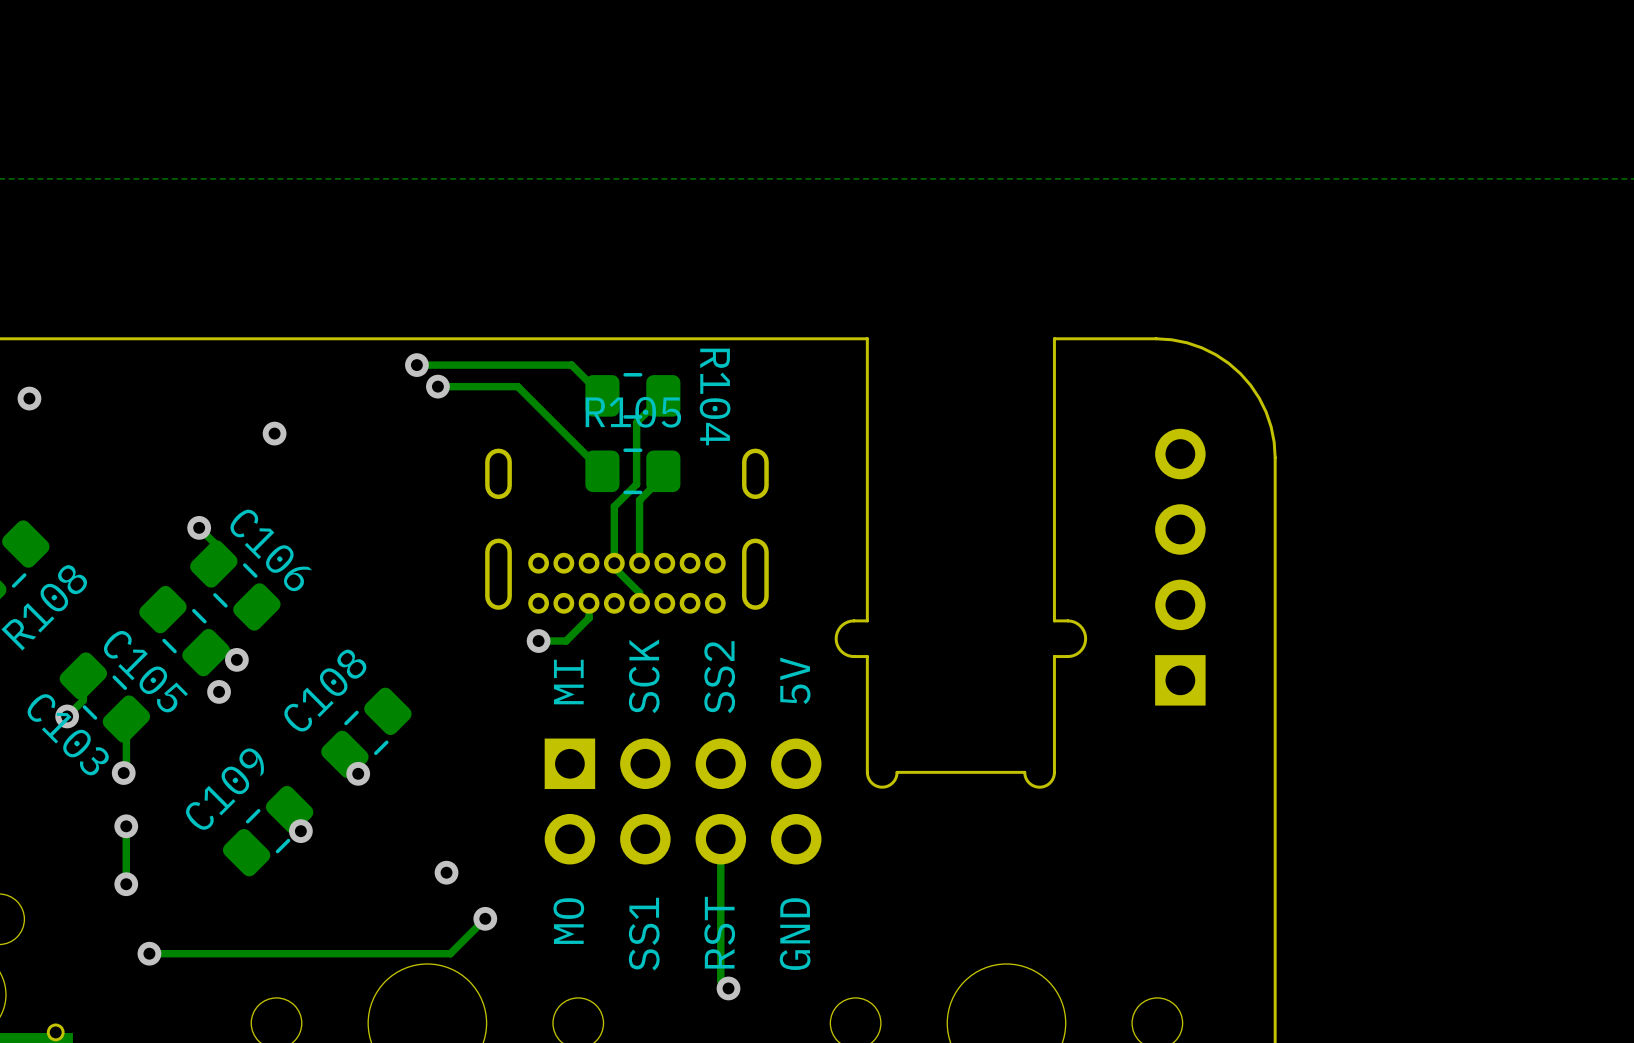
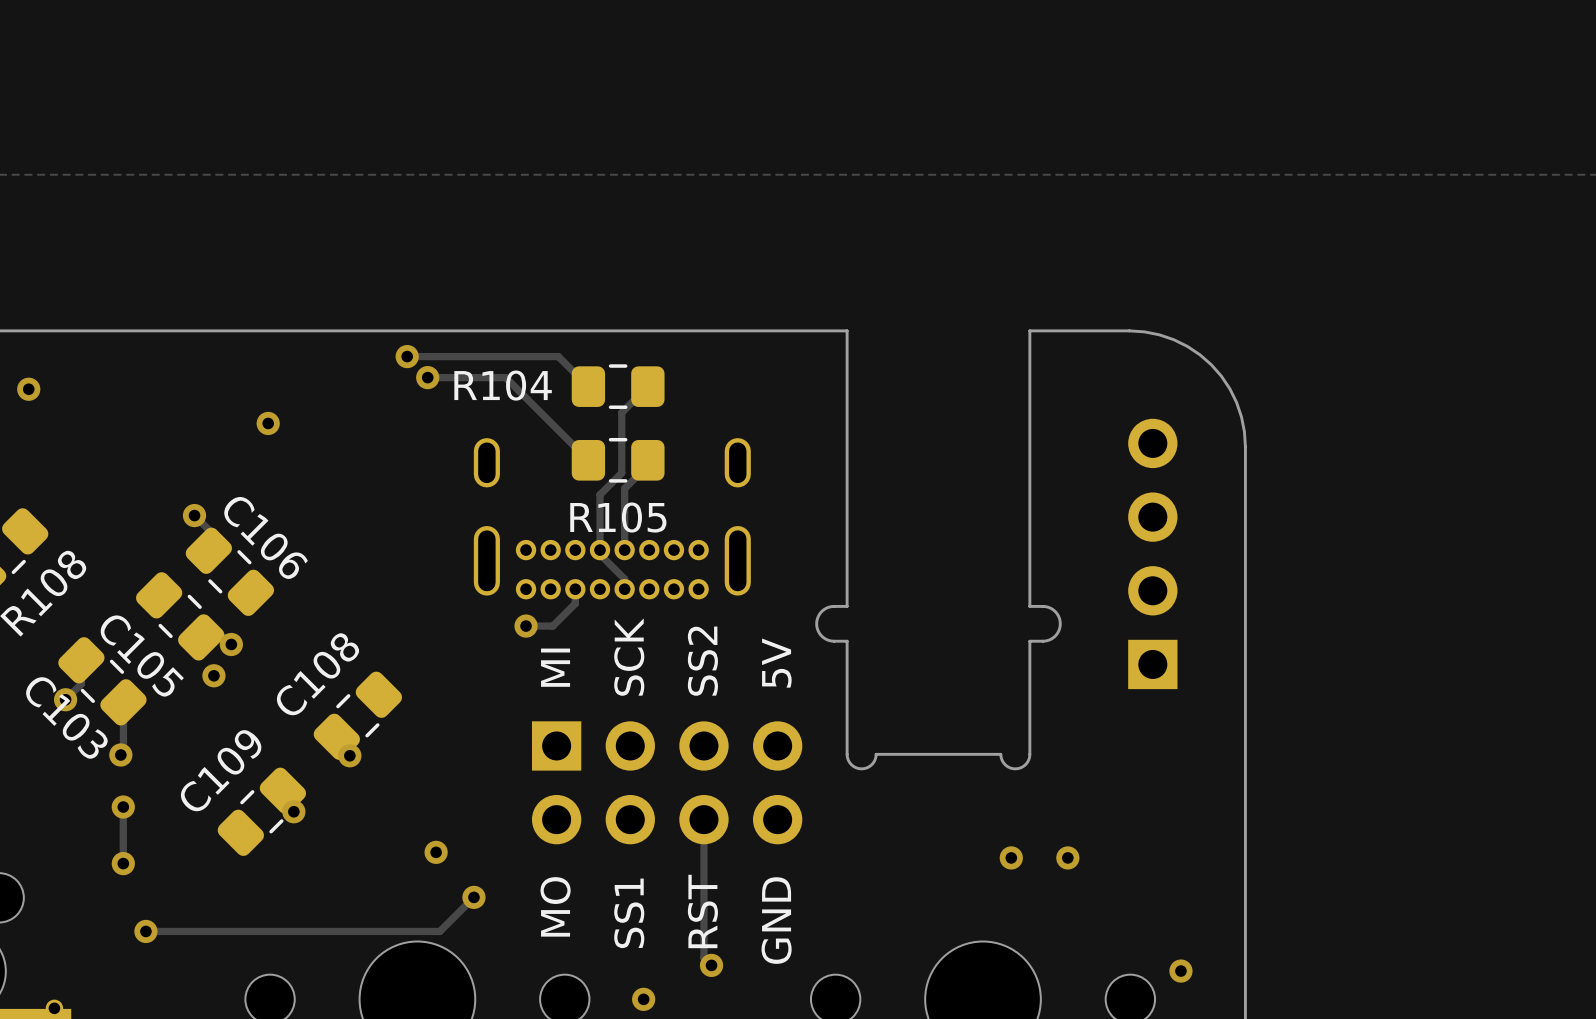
R104 name rotation: 0° (715, 396) -> 90° counterclockwise (503, 385)
R104 name position: R104 (715, 396) -> R104 (503, 385)
R105 name position: R105 (633, 412) -> R105 (618, 517)
via: none -> (1011, 857)
via: none -> (1067, 857)
via: none -> (1180, 971)
via: none -> (643, 999)

